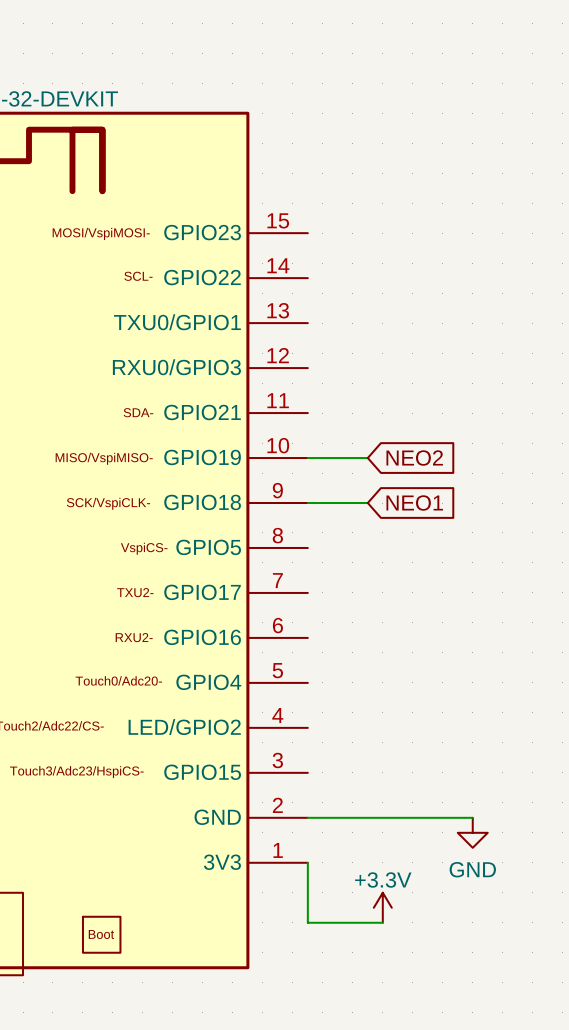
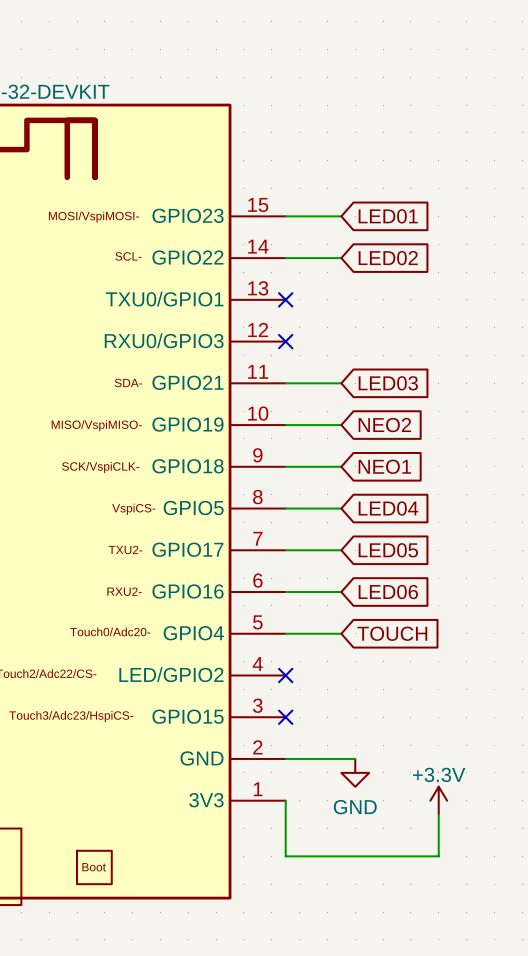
wire: none -> (285, 216) (341, 216)
global label: none -> LED01 (388, 216)
wire: none -> (285, 258) (341, 258)
global label: none -> LED02 (388, 258)
no-connect mark: none -> (285, 299)
no-connect mark: none -> (285, 341)
wire: none -> (285, 383) (341, 383)
global label: none -> LED03 (388, 383)
wire: none -> (285, 508) (341, 508)
global label: none -> LED04 (388, 508)
wire: none -> (285, 550) (341, 550)
global label: none -> LED05 (388, 550)
wire: none -> (285, 592) (341, 592)
global label: none -> LED06 (388, 592)
wire: none -> (285, 633) (341, 633)
global label: none -> TOUCH (392, 633)
no-connect mark: none -> (285, 675)
no-connect mark: none -> (285, 717)
wire: (382, 817) (472, 817) -> none
power symbol position: GND (472, 832) -> GND (355, 772)
wire: none -> (438, 814) (438, 856) (355, 856)
power symbol position: +3.3V (382, 907) -> +3.3V (438, 800)

